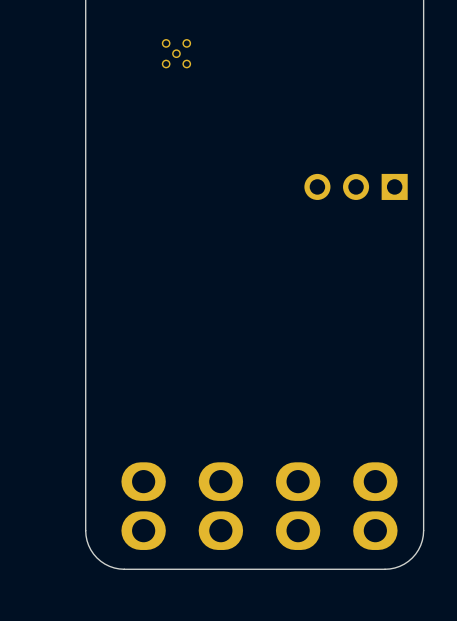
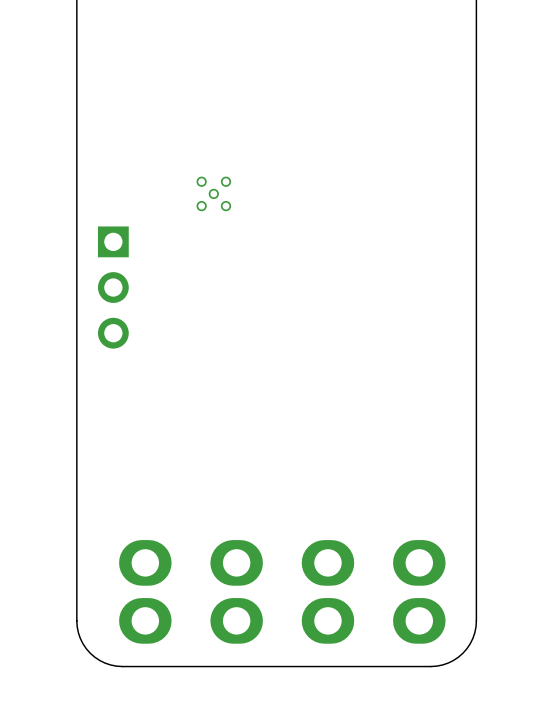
part position: (176, 53) -> (213, 193)
part rotation: 0° (356, 186) -> 90° counterclockwise (113, 287)
part position: (356, 186) -> (113, 287)

